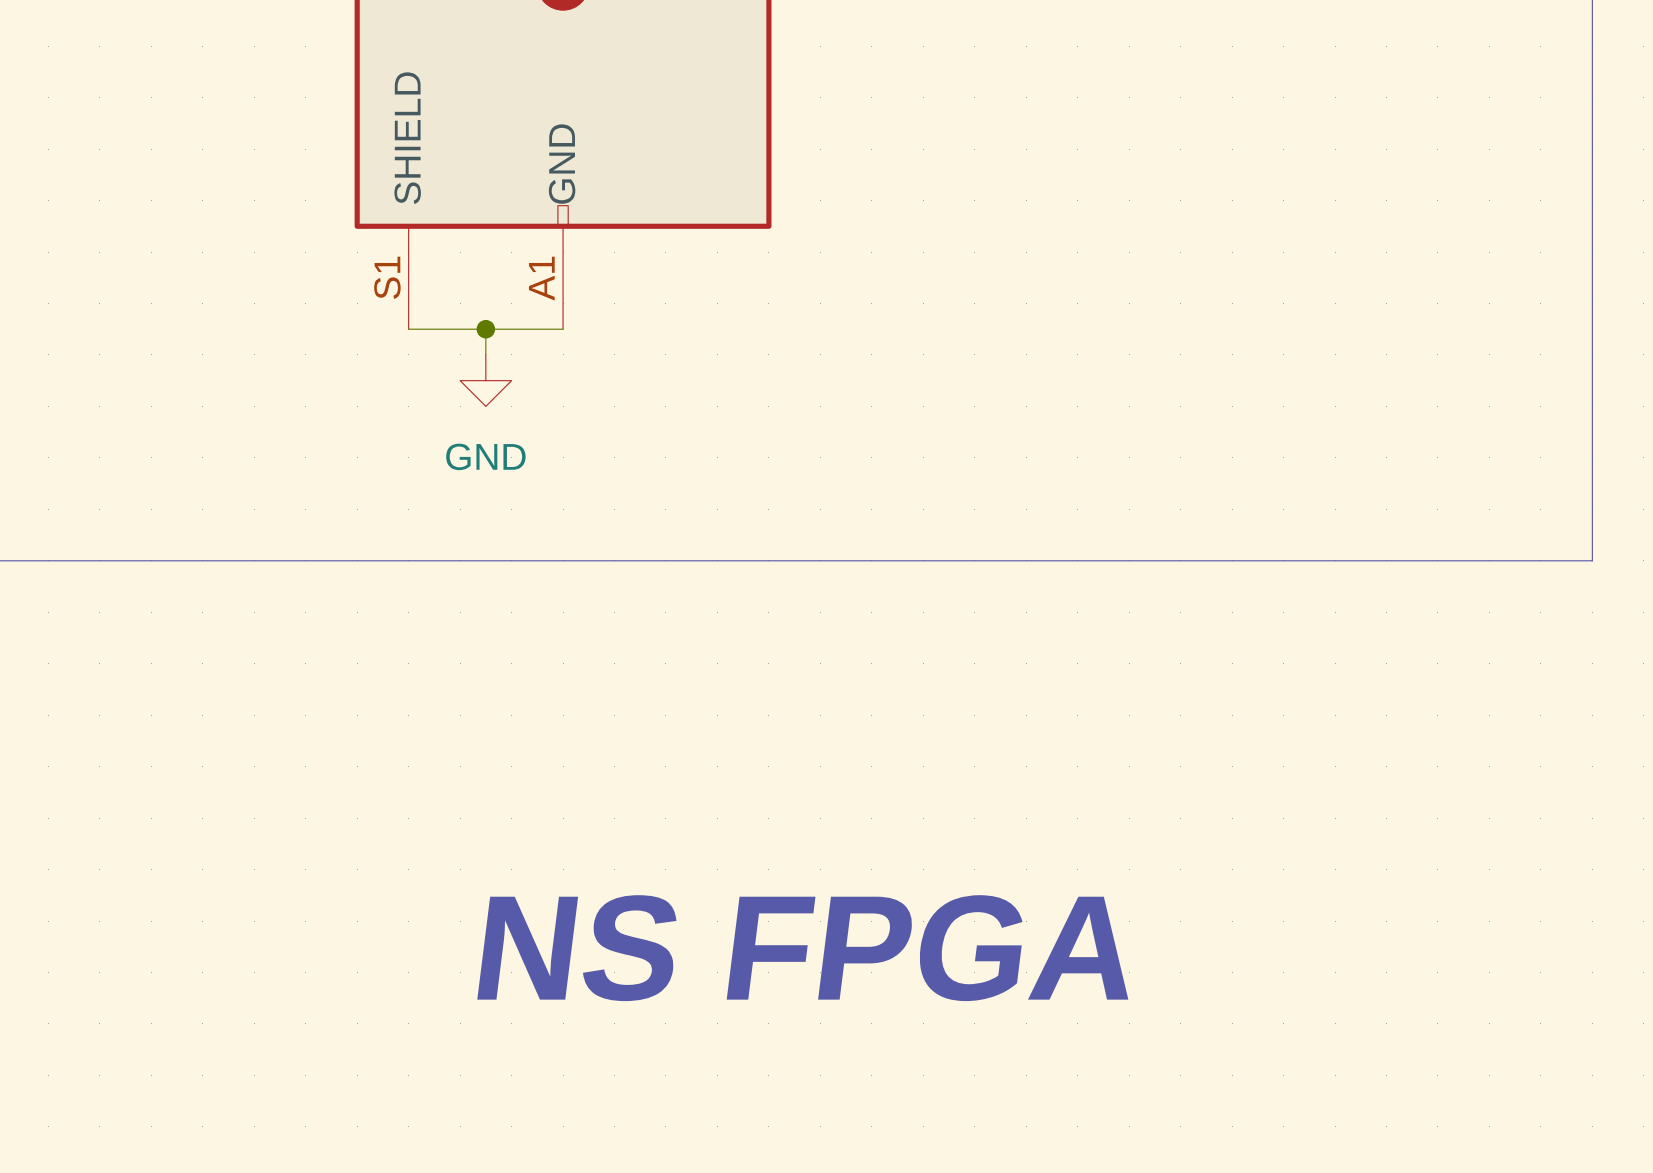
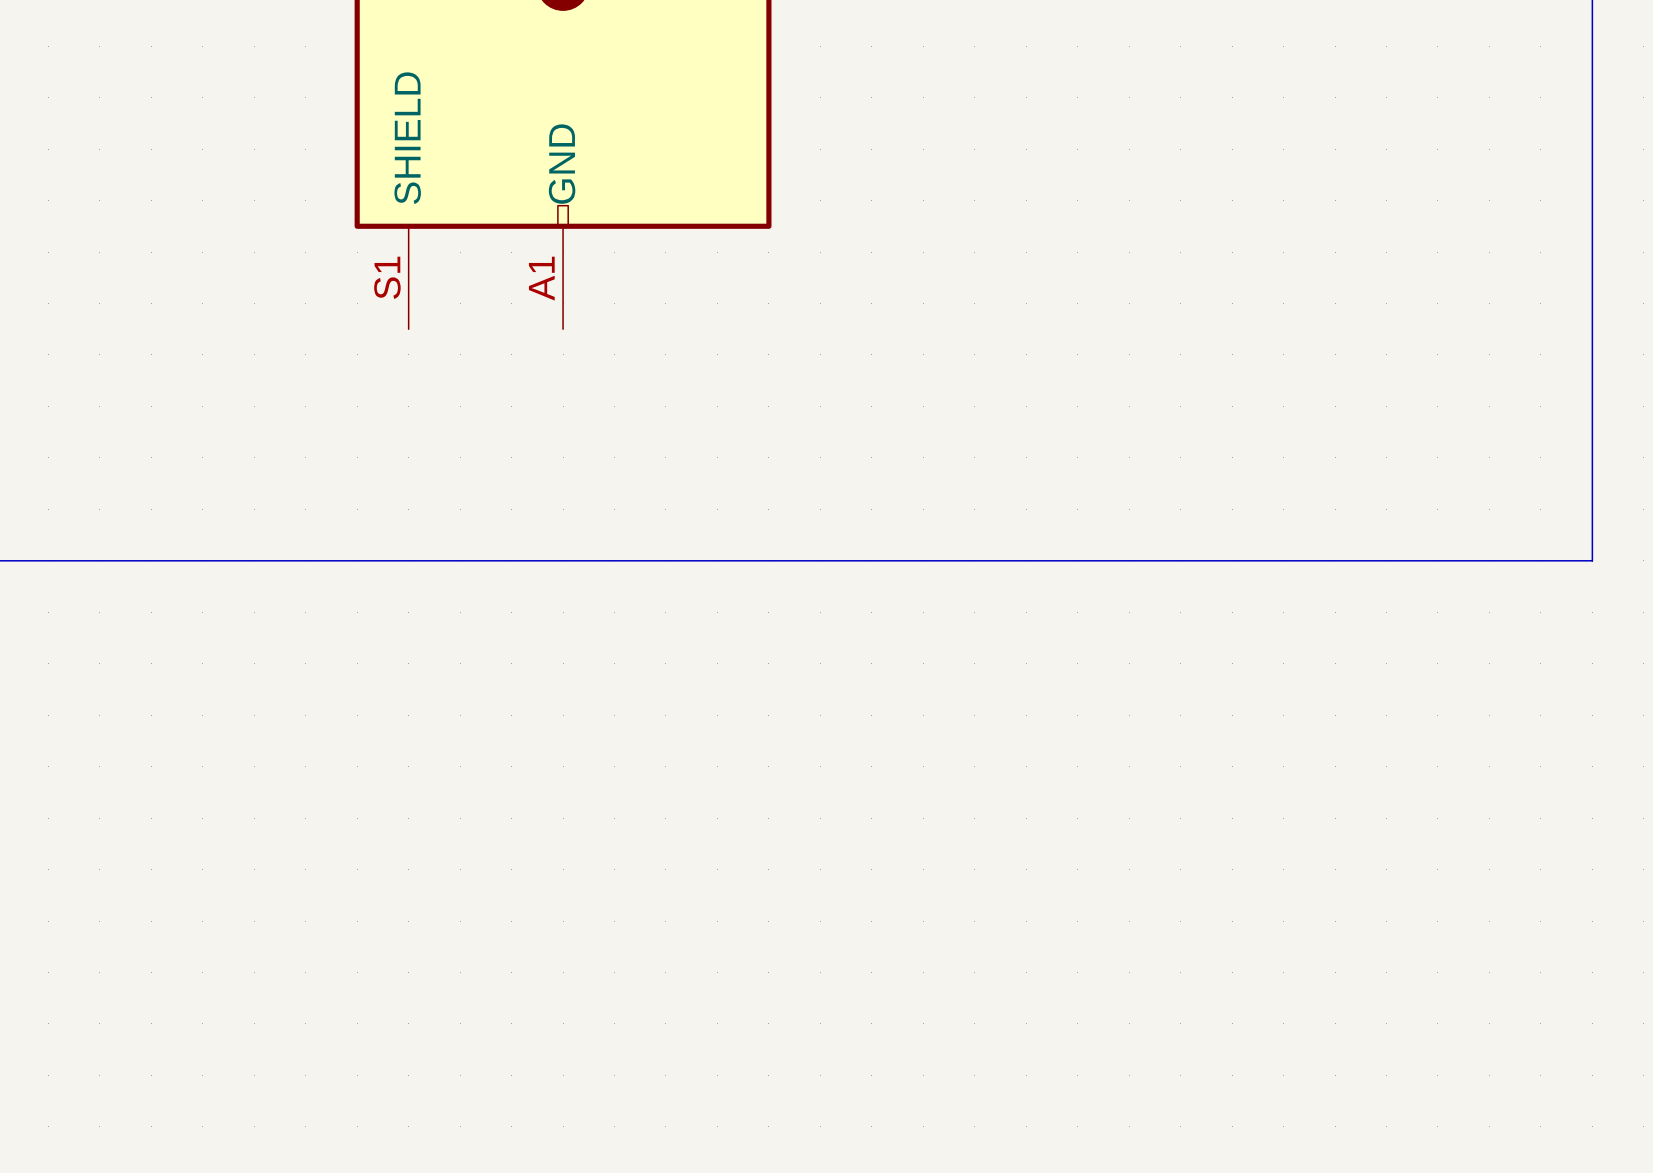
wire: (408, 329) (563, 329) -> none
wire: (485, 329) (485, 354) -> none
junction: (485, 329) -> none
power symbol: GND (485, 380) -> none
text: NS FPGA (802, 948) -> none

